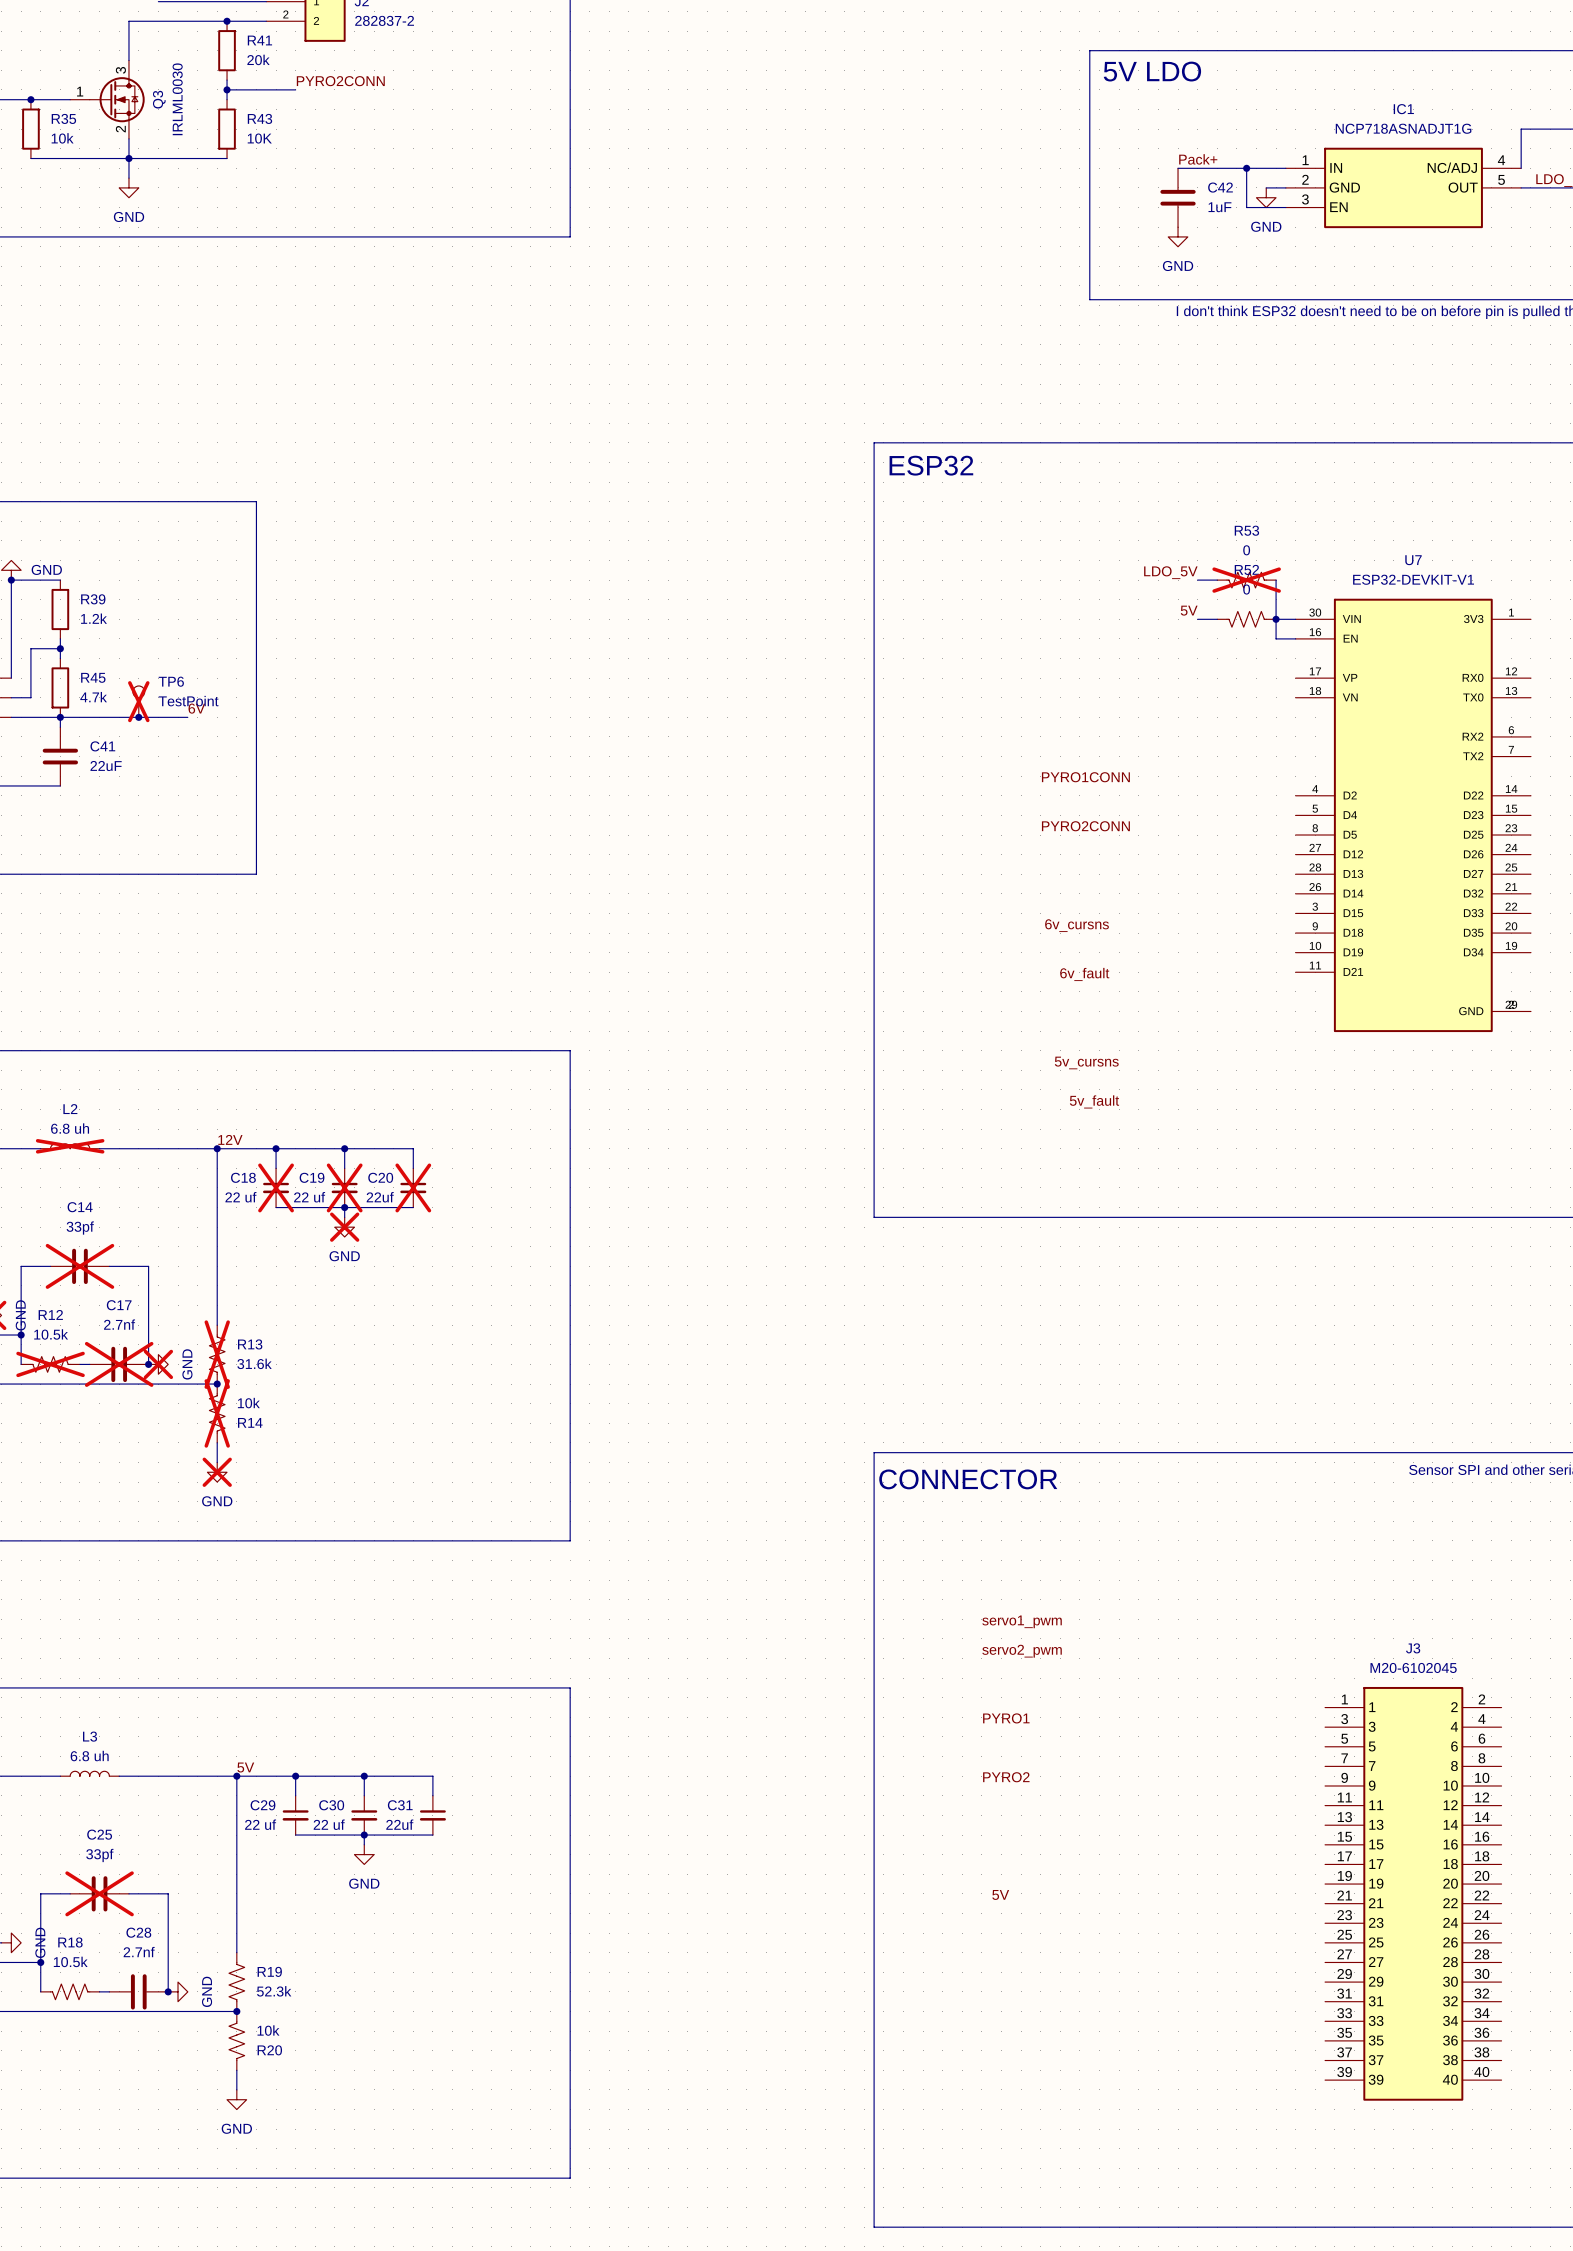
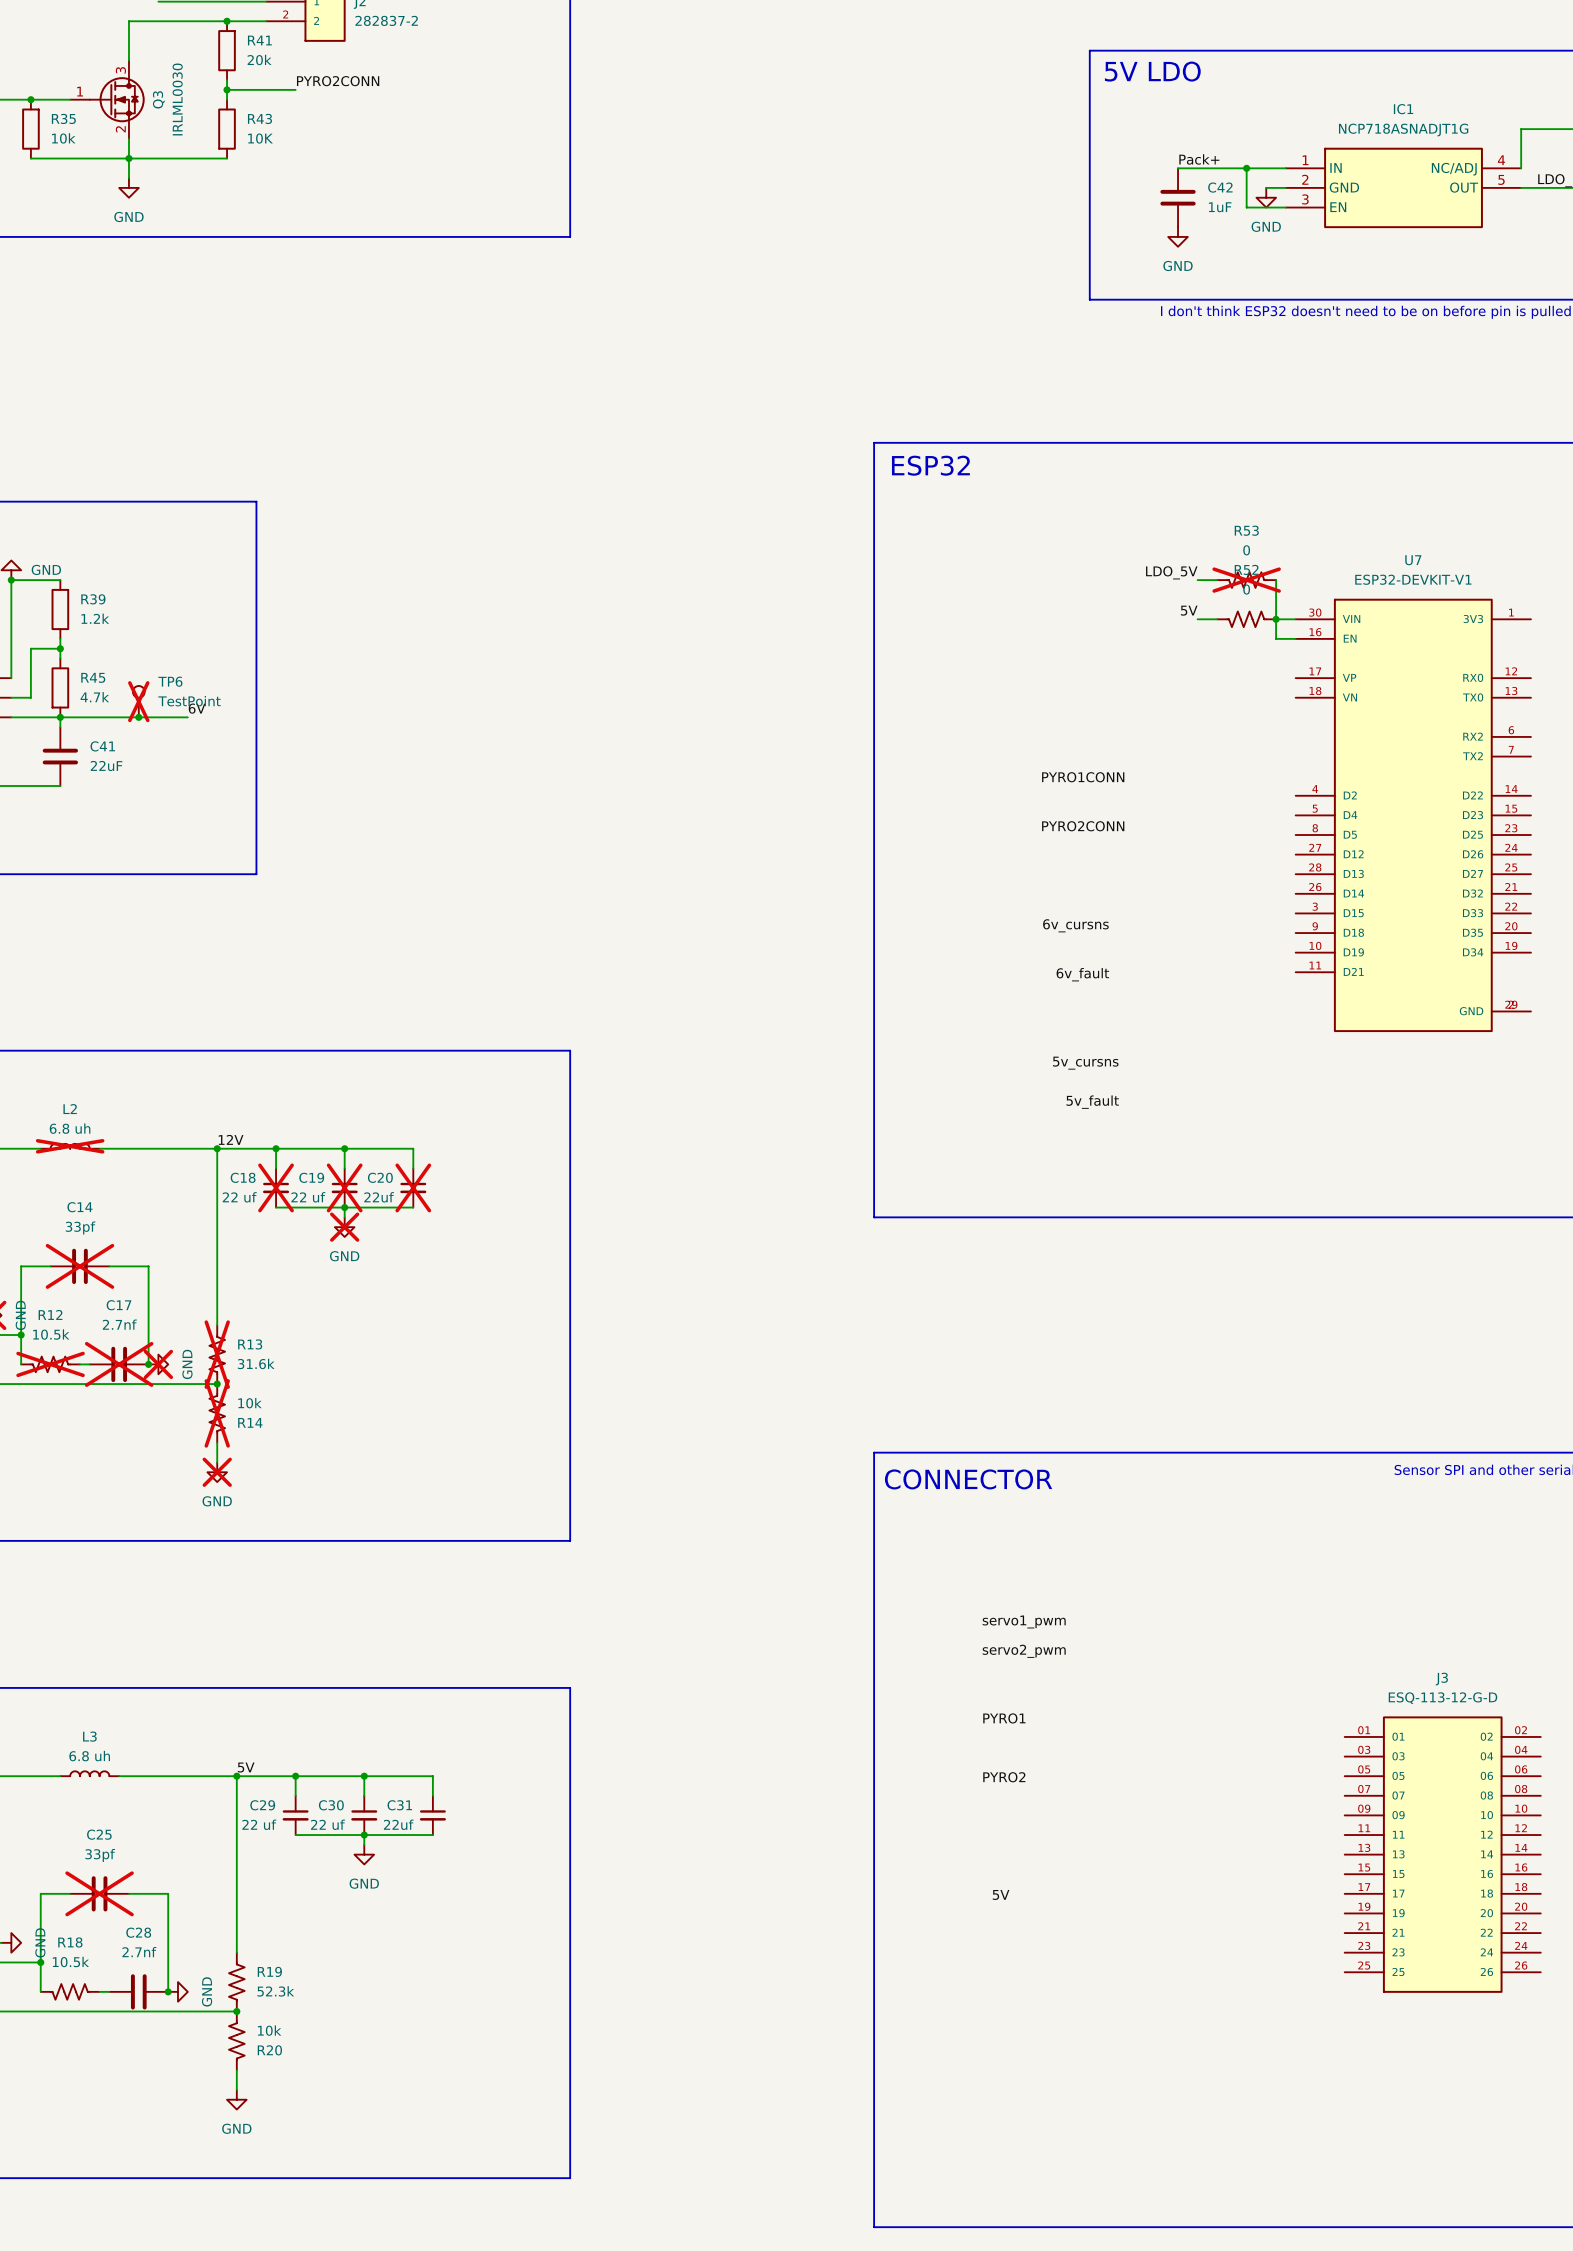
J3 name position: J3 (1413, 1648) -> J3 (1441, 1679)
J3 value: M20-6102045 (1413, 1667) -> ESQ-113-12-G-D (1442, 1698)
J3 symbol: [1325, 1686, 1502, 2101] -> [1344, 1716, 1541, 1993]

